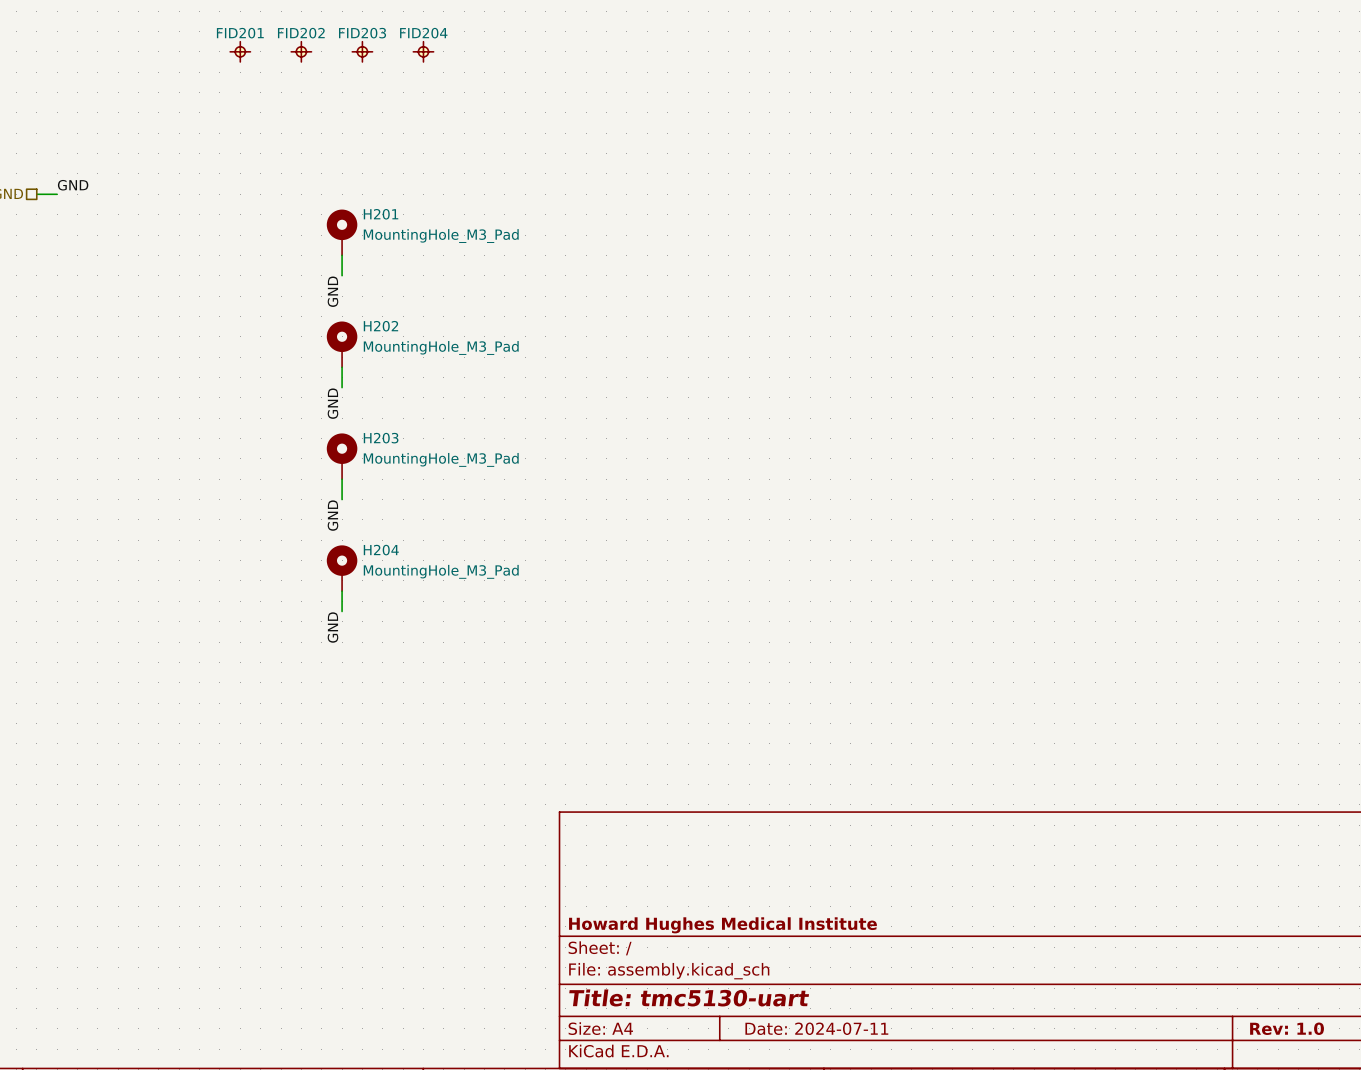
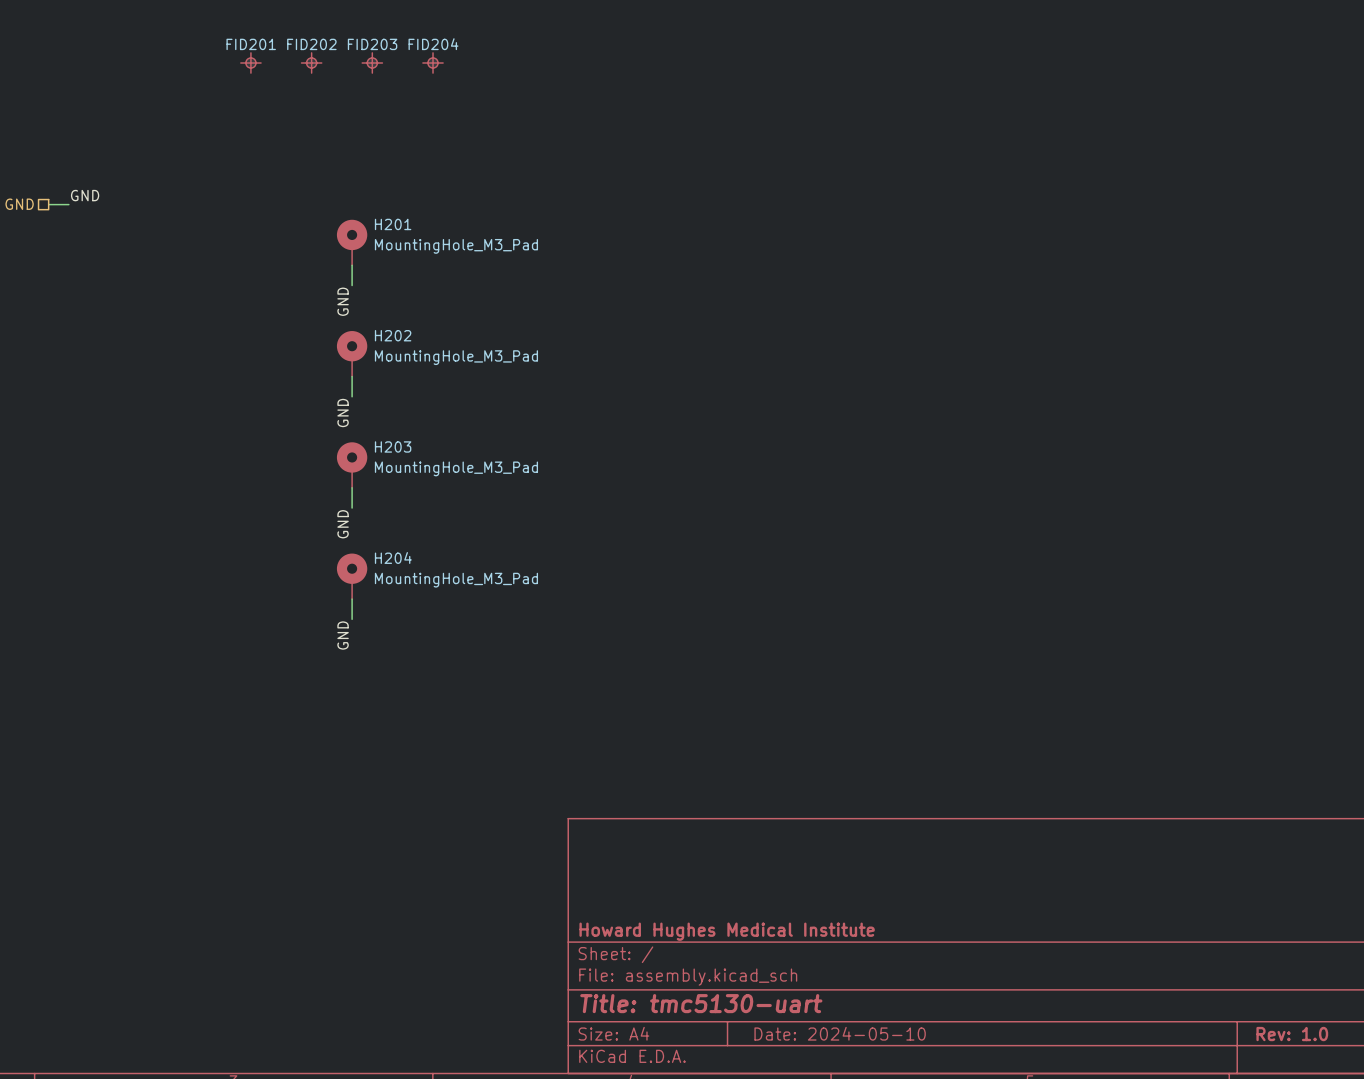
title block: Date: 2024-07-11 (816, 1028) -> Date: 2024-05-10 (840, 1033)

